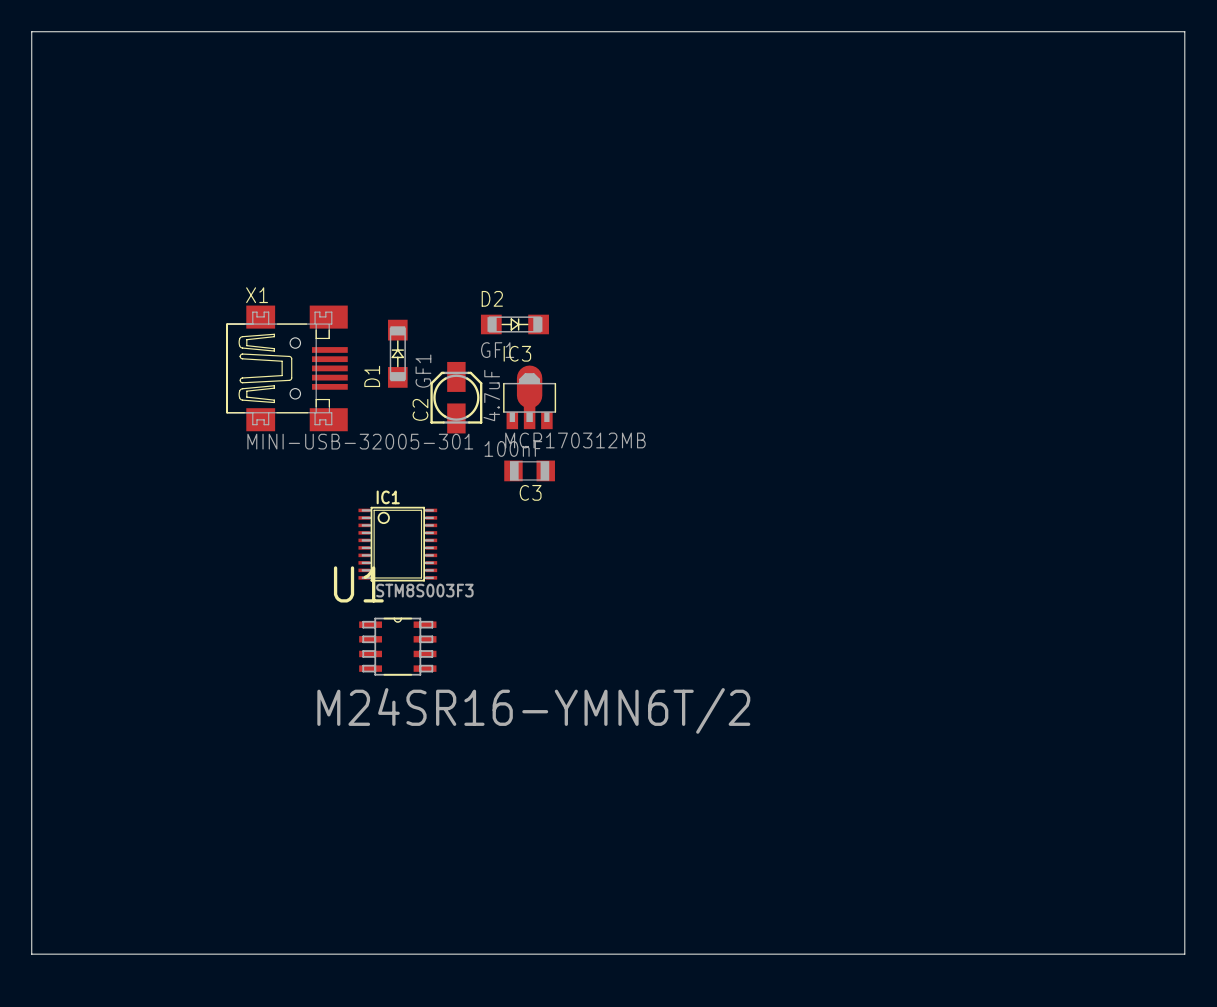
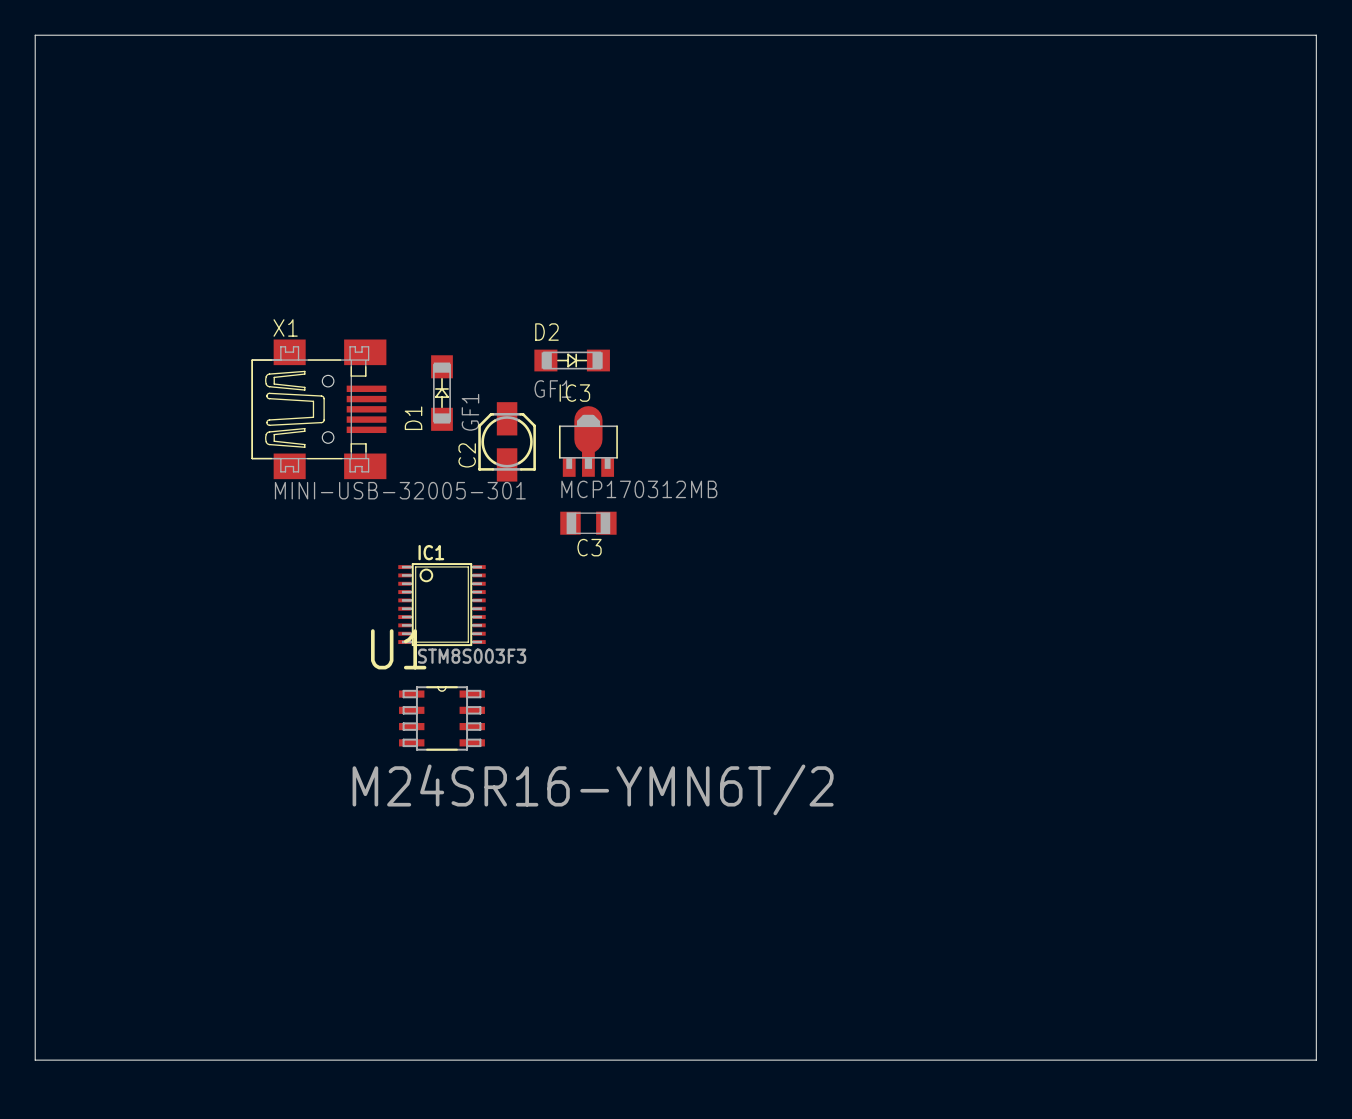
C2 value: 4.7uF (491, 395) -> none
C3 value: 100nF (513, 448) -> none

